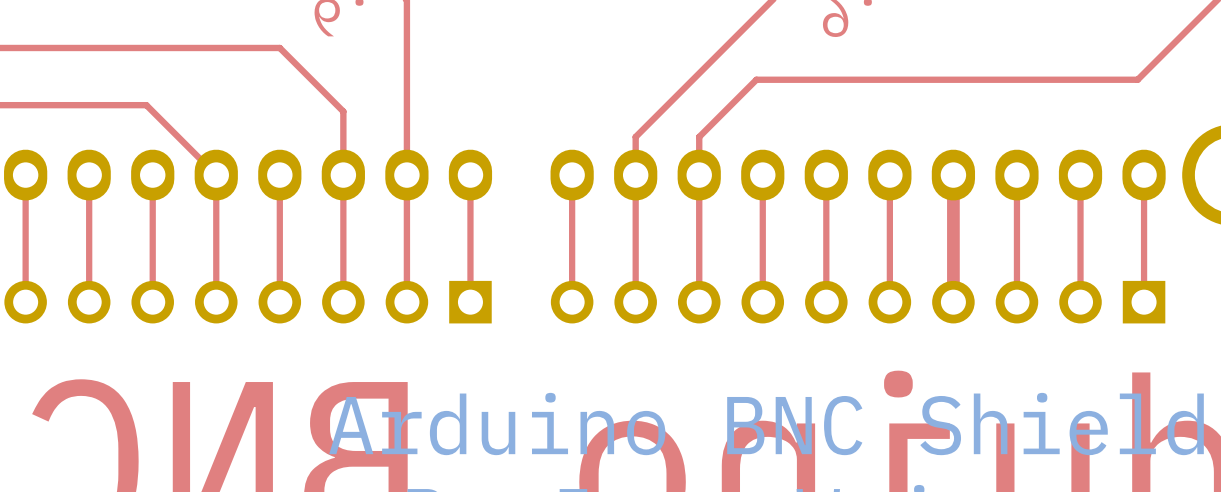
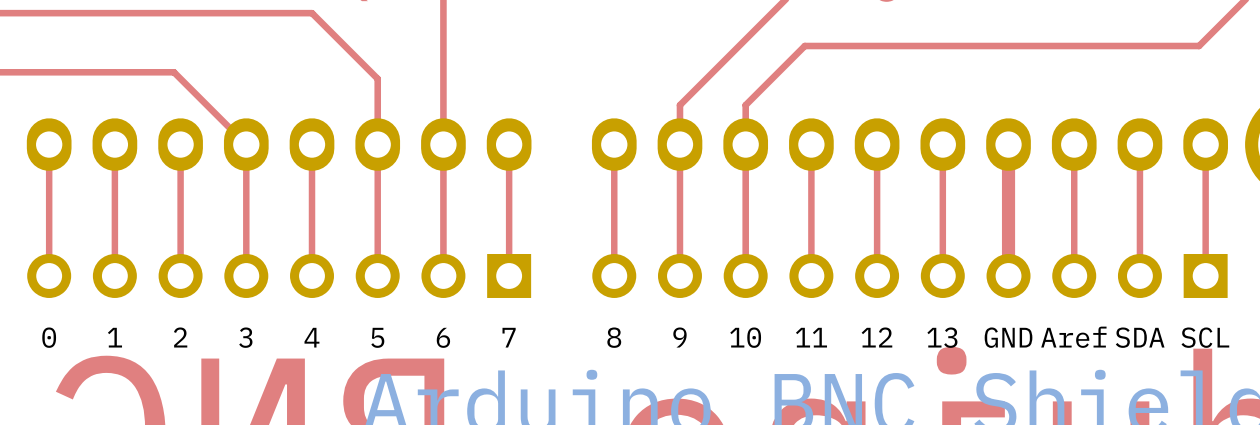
text: none -> 0 (49, 337)
text: none -> 1 (114, 337)
text: none -> 2 (180, 337)
text: none -> 3 (245, 337)
text: none -> 4 (311, 337)
text: none -> 5 (377, 337)
text: none -> 6 (443, 337)
text: none -> 7 (509, 337)
text: none -> 8 (614, 337)
text: none -> 9 (679, 337)
text: none -> 10 (745, 337)
text: none -> 11 (811, 337)
text: none -> 12 (876, 337)
text: none -> 13 (942, 337)
text: none -> GND (1008, 337)
text: none -> Aref (1073, 337)
text: none -> SDA (1140, 337)
text: none -> SCL (1205, 337)

